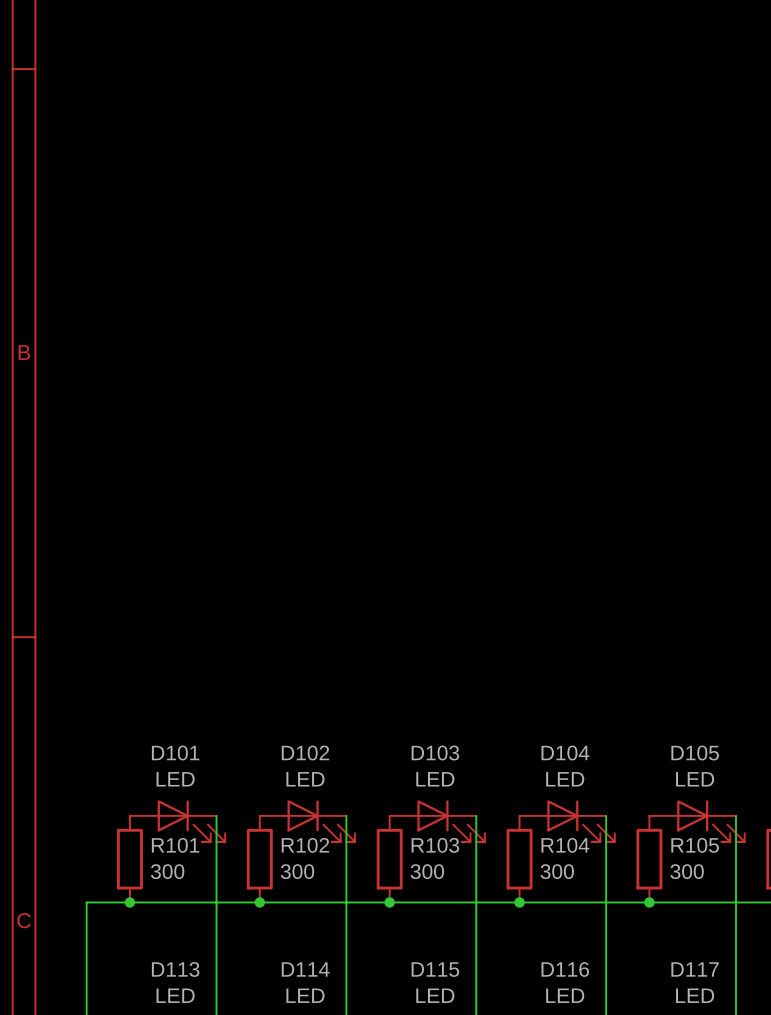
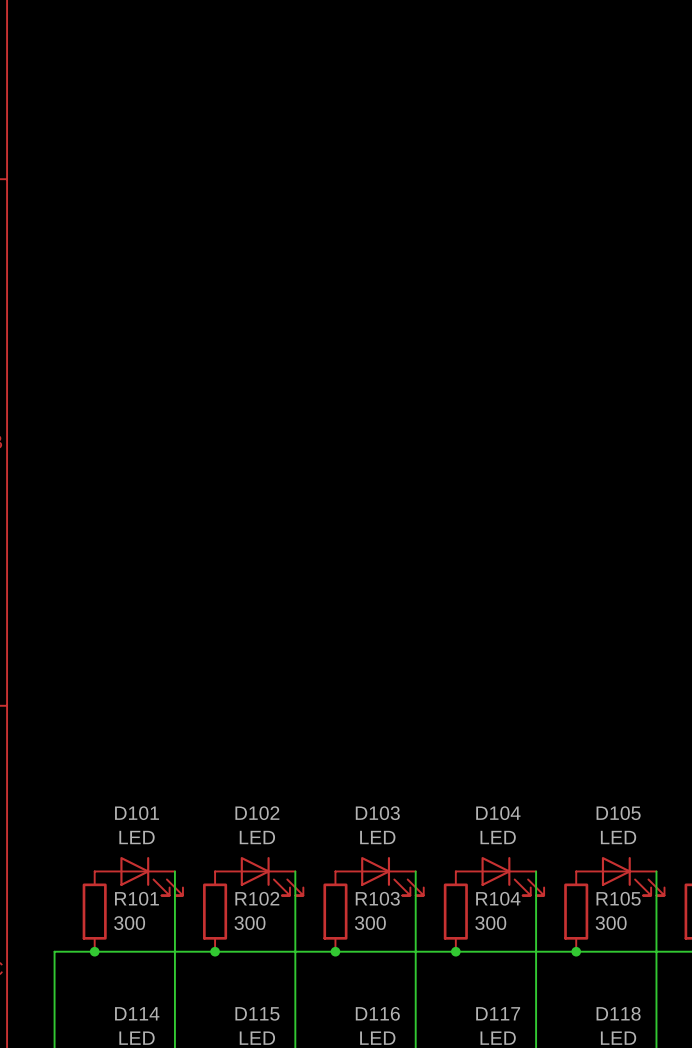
D113 name: D113 (175, 969) -> D114 (137, 1013)
D114 name: D114 (305, 969) -> D115 (257, 1013)
D115 name: D115 (435, 969) -> D116 (377, 1013)
D116 name: D116 (565, 969) -> D117 (498, 1013)
D117 name: D117 (695, 969) -> D118 (618, 1013)

